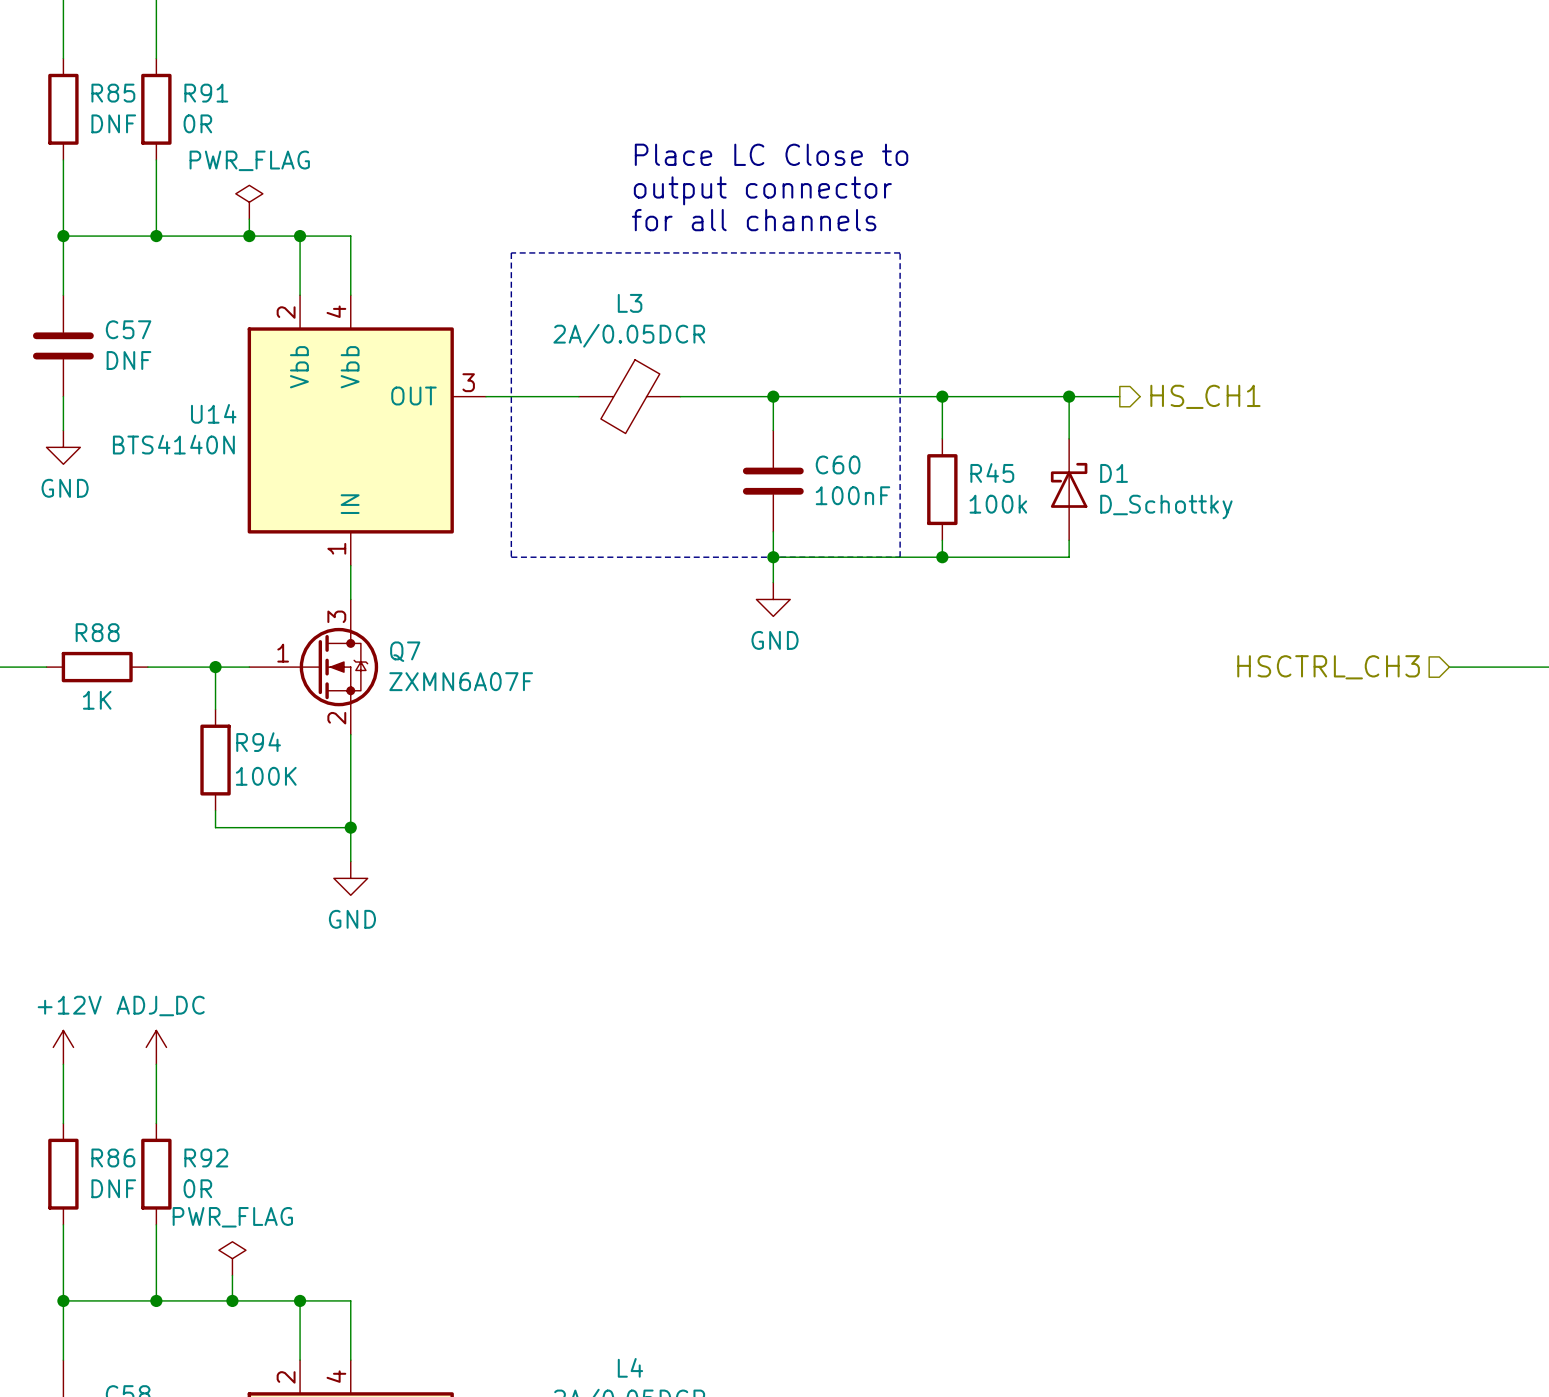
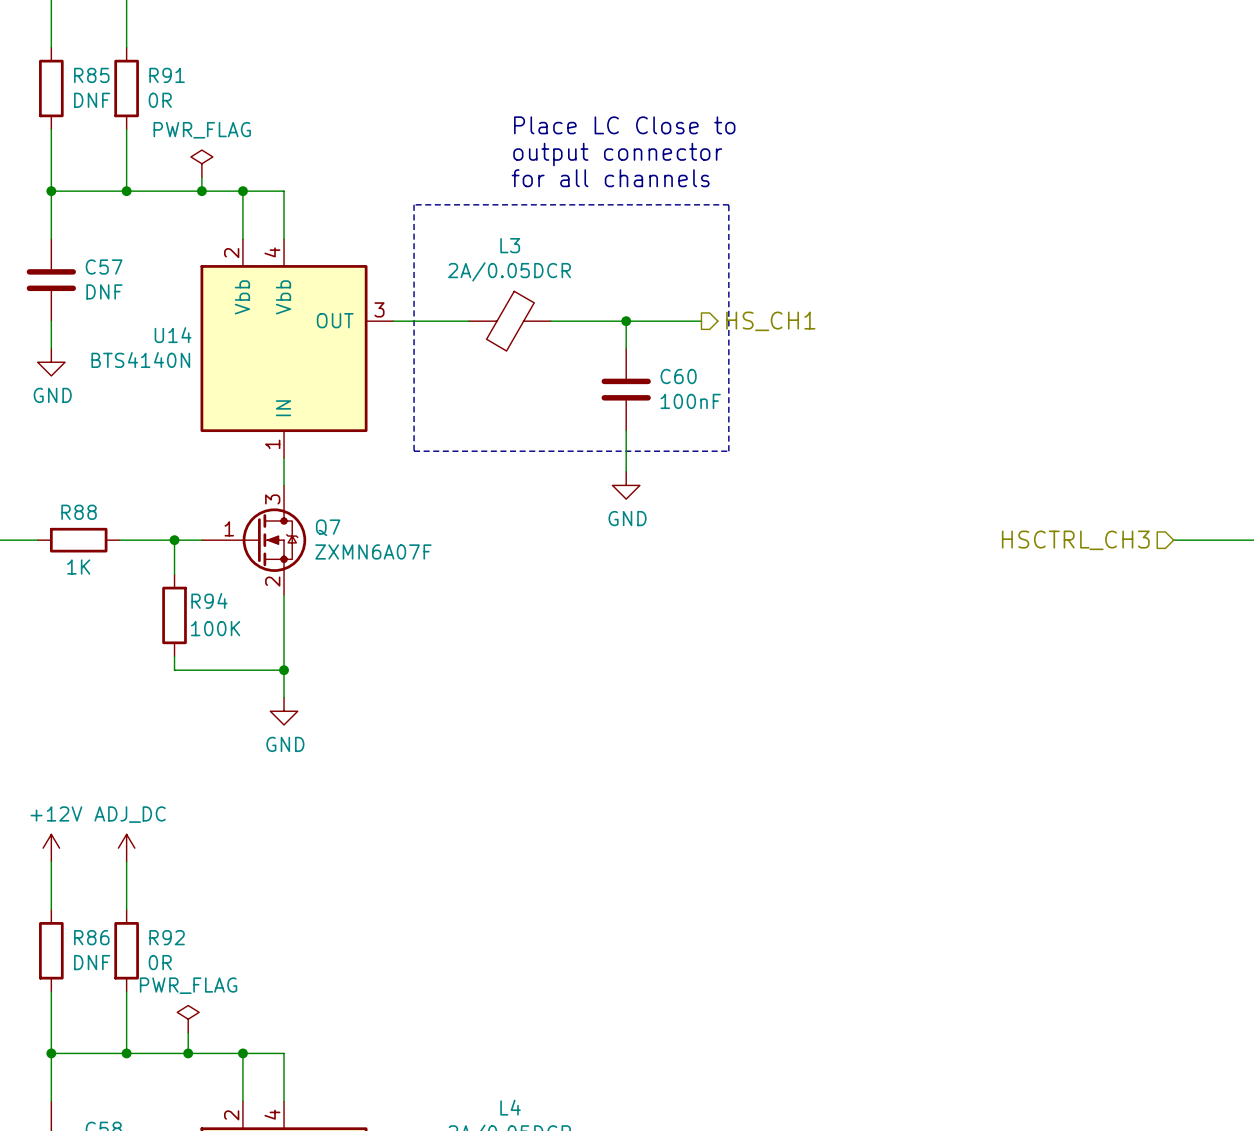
wire: (866, 396) (1119, 396) -> none
wire: (942, 396) (942, 438) -> none
junction: (942, 396) -> none
wire: (1069, 396) (1069, 438) -> none
junction: (1069, 396) -> none
hierarchical label position: HS_CH1 (1205, 396) -> HS_CH1 (770, 321)
R45: 100k (942, 489) -> none
D1: D_Schottky (1069, 489) -> none
wire: (942, 540) (942, 557) -> none
wire: (1069, 540) (1069, 557) (773, 557) -> none
junction: (773, 557) -> none
junction: (942, 557) -> none

